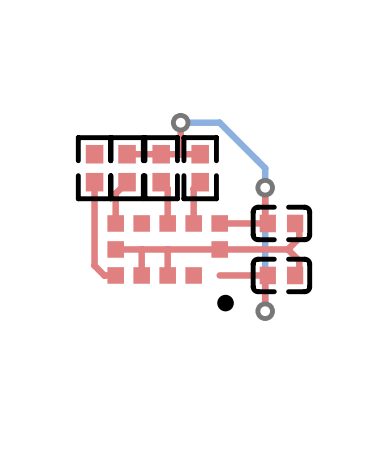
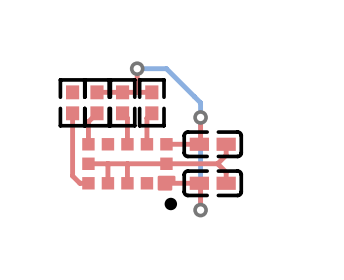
part footprint: [250, 204, 313, 243] -> [182, 130, 244, 159]
part footprint: [107, 215, 234, 312] -> [82, 138, 178, 211]
part footprint: [250, 256, 313, 295] -> [182, 169, 244, 198]

